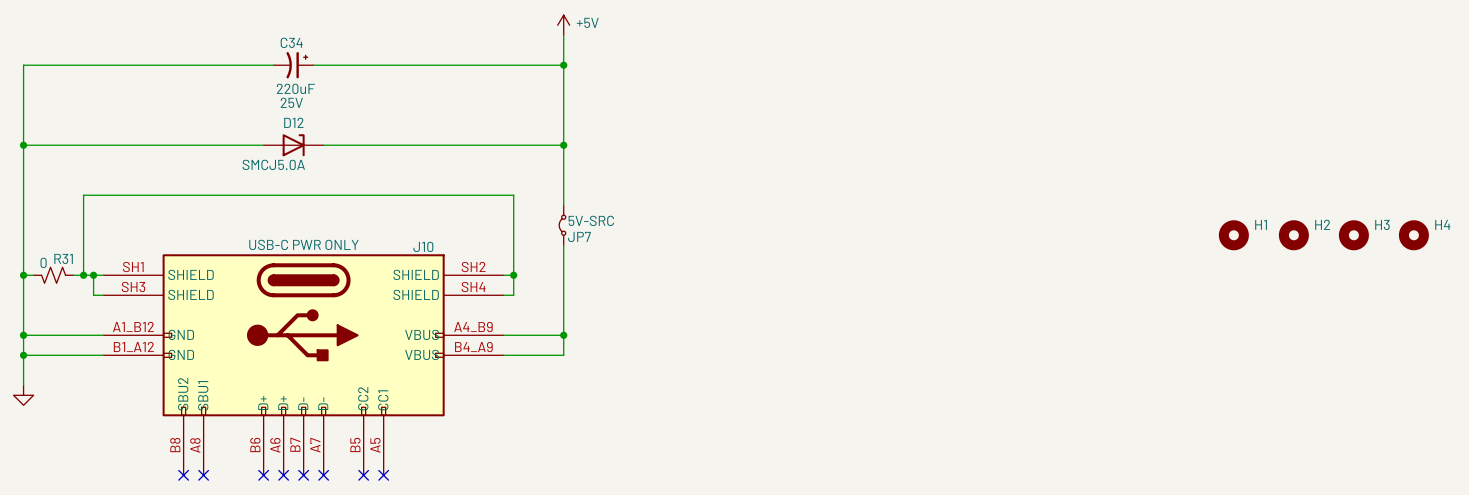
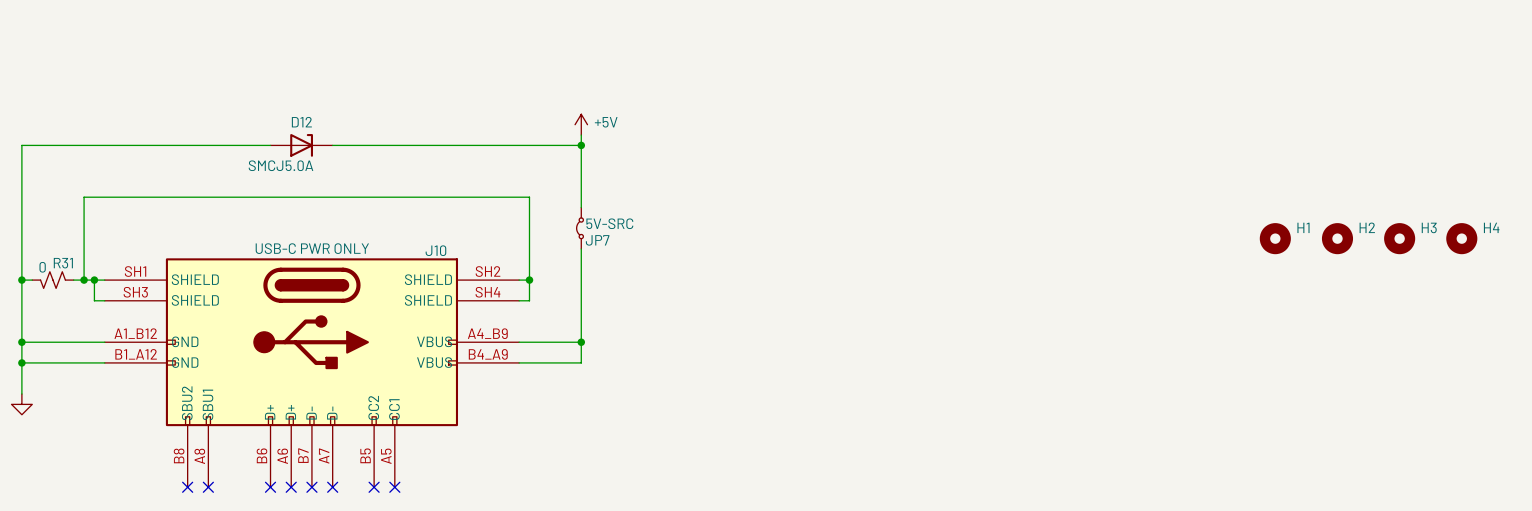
power symbol position: +5V (563, 25) -> +5V (581, 124)
wire: (563, 35) (563, 135) -> none
wire: (273, 65) (23, 65) (23, 145) -> none
C34: 220uF (293, 65) -> none
wire: (313, 65) (563, 65) -> none
junction: (563, 65) -> none
junction: (23, 145) -> none

